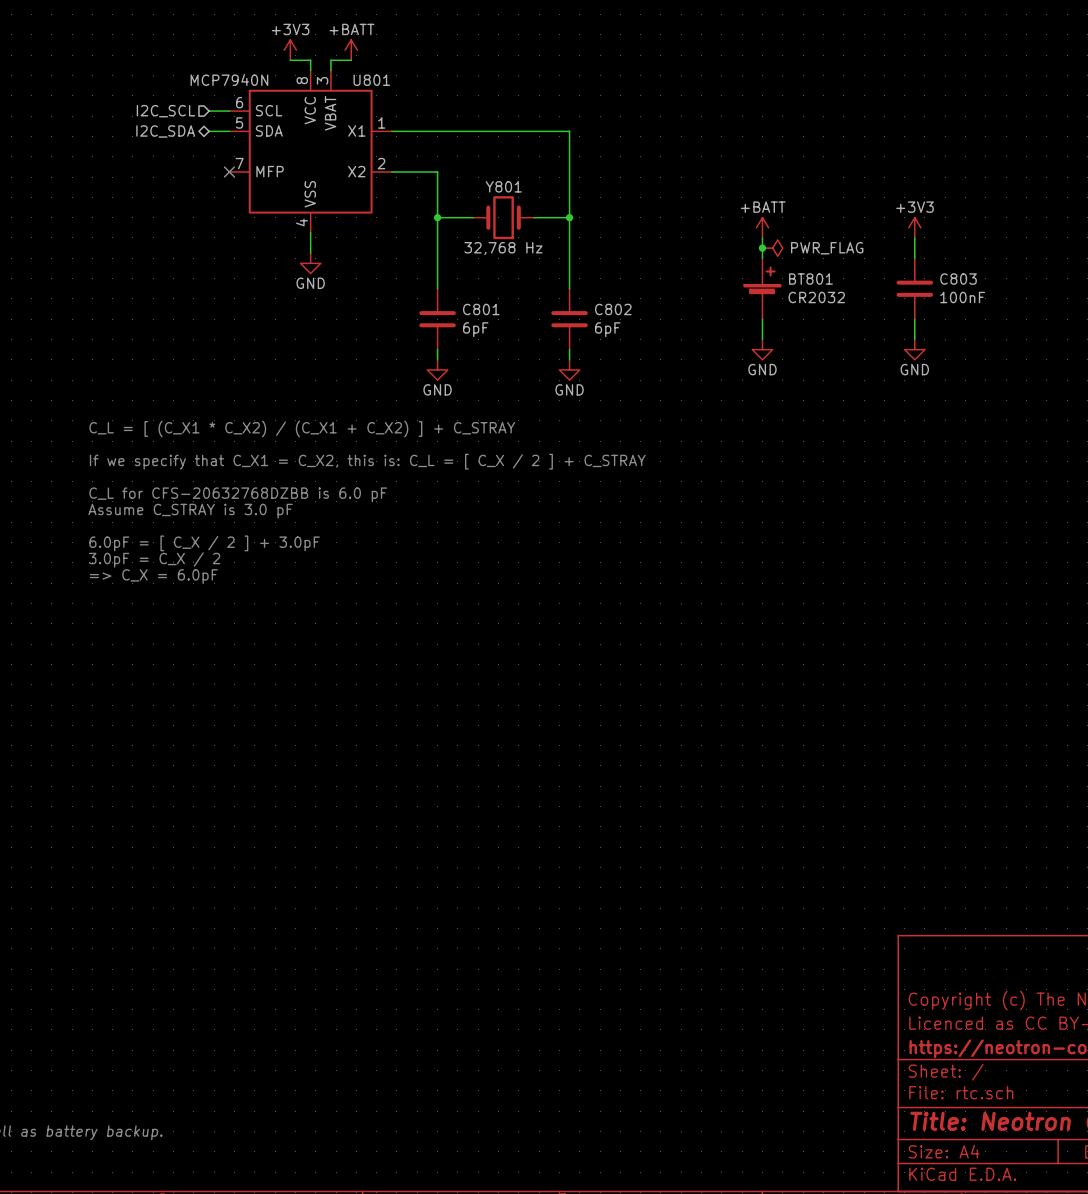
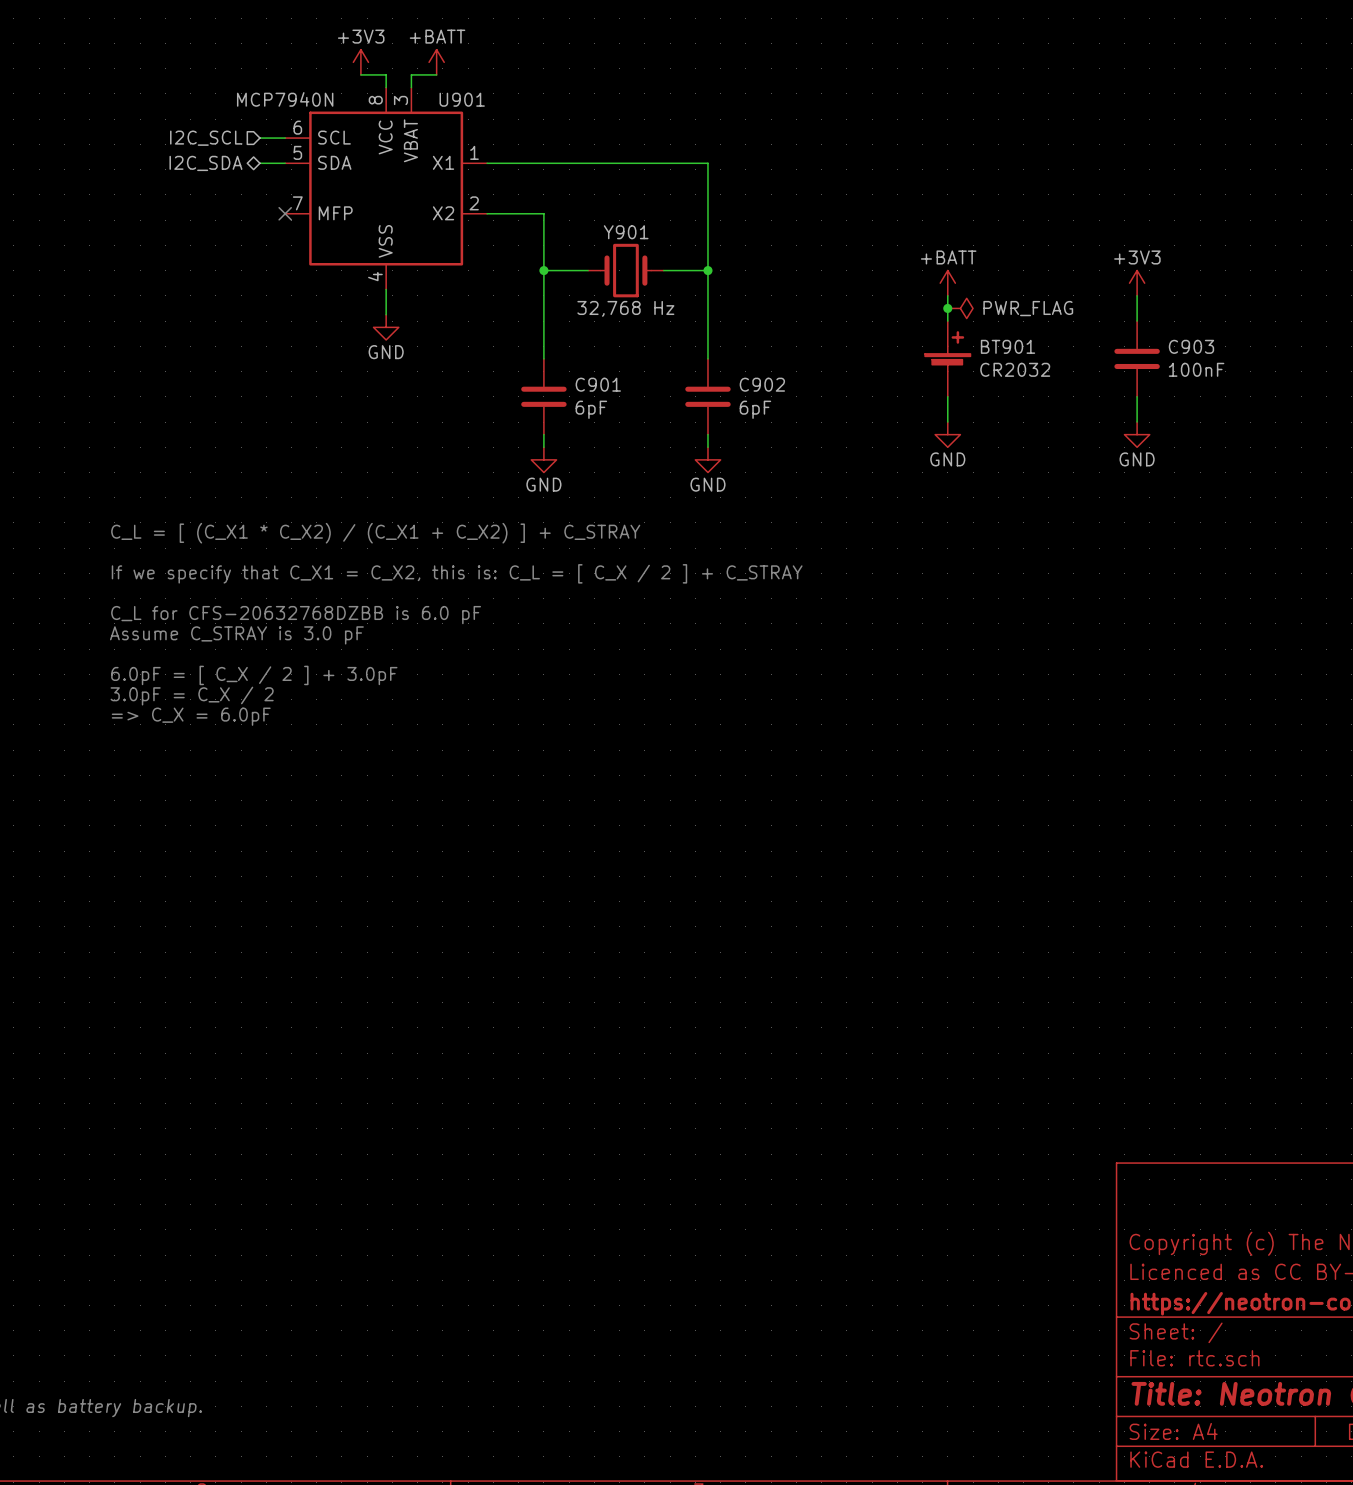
U801 name: U801 (371, 80) -> U901 (462, 99)
Y801 name: Y801 (503, 186) -> Y901 (626, 232)
BT801 name: BT801 (810, 279) -> BT901 (1008, 346)
C803 name: C803 (958, 279) -> C903 (1191, 346)
C801 name: C801 (481, 309) -> C901 (598, 384)
C802 name: C802 (613, 309) -> C902 (762, 384)

